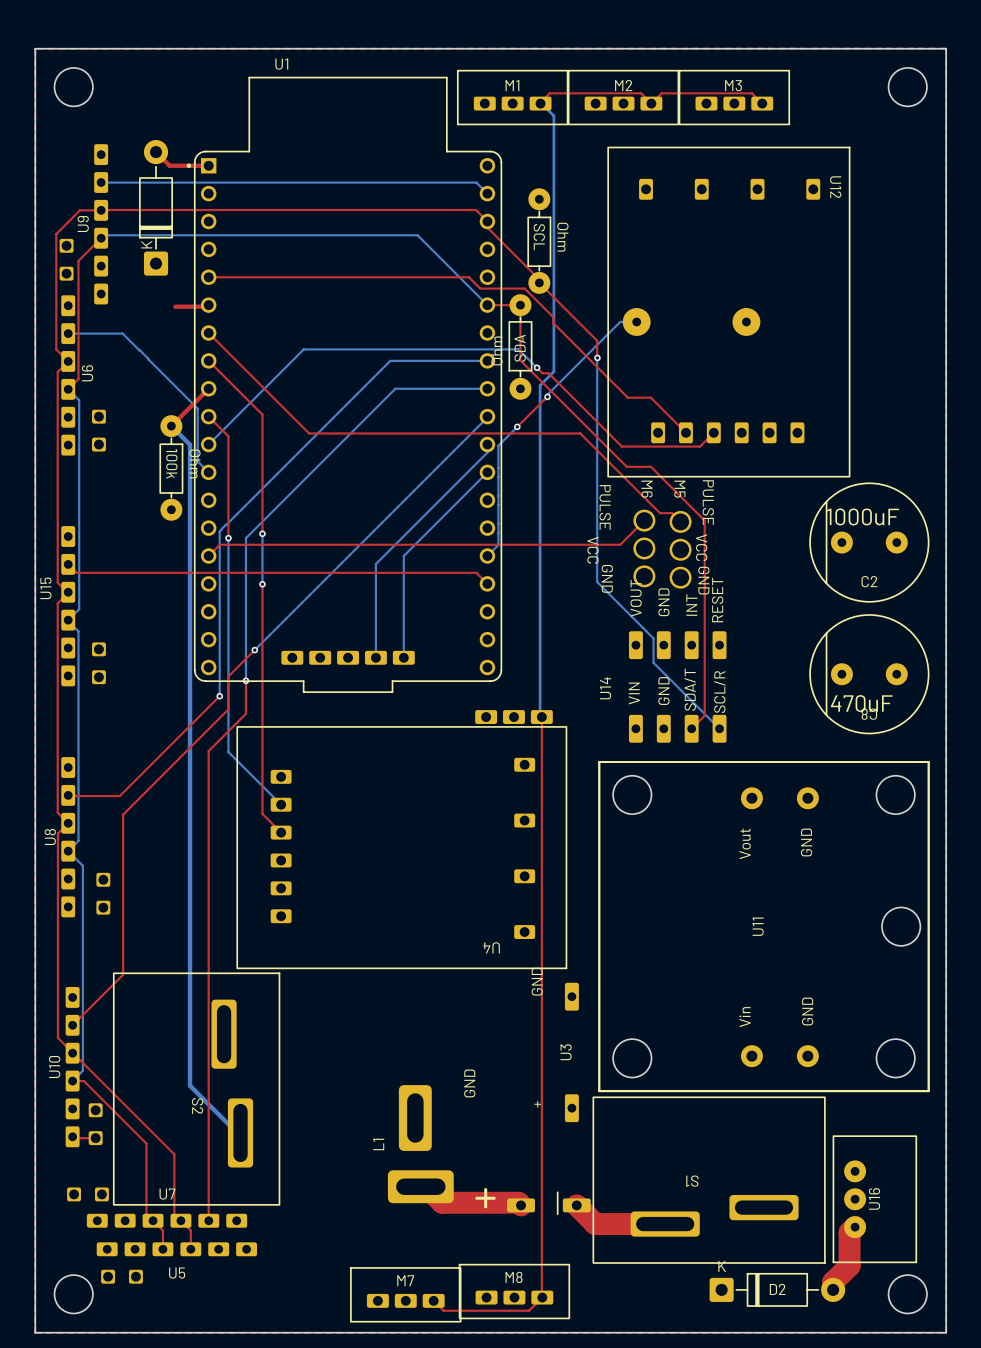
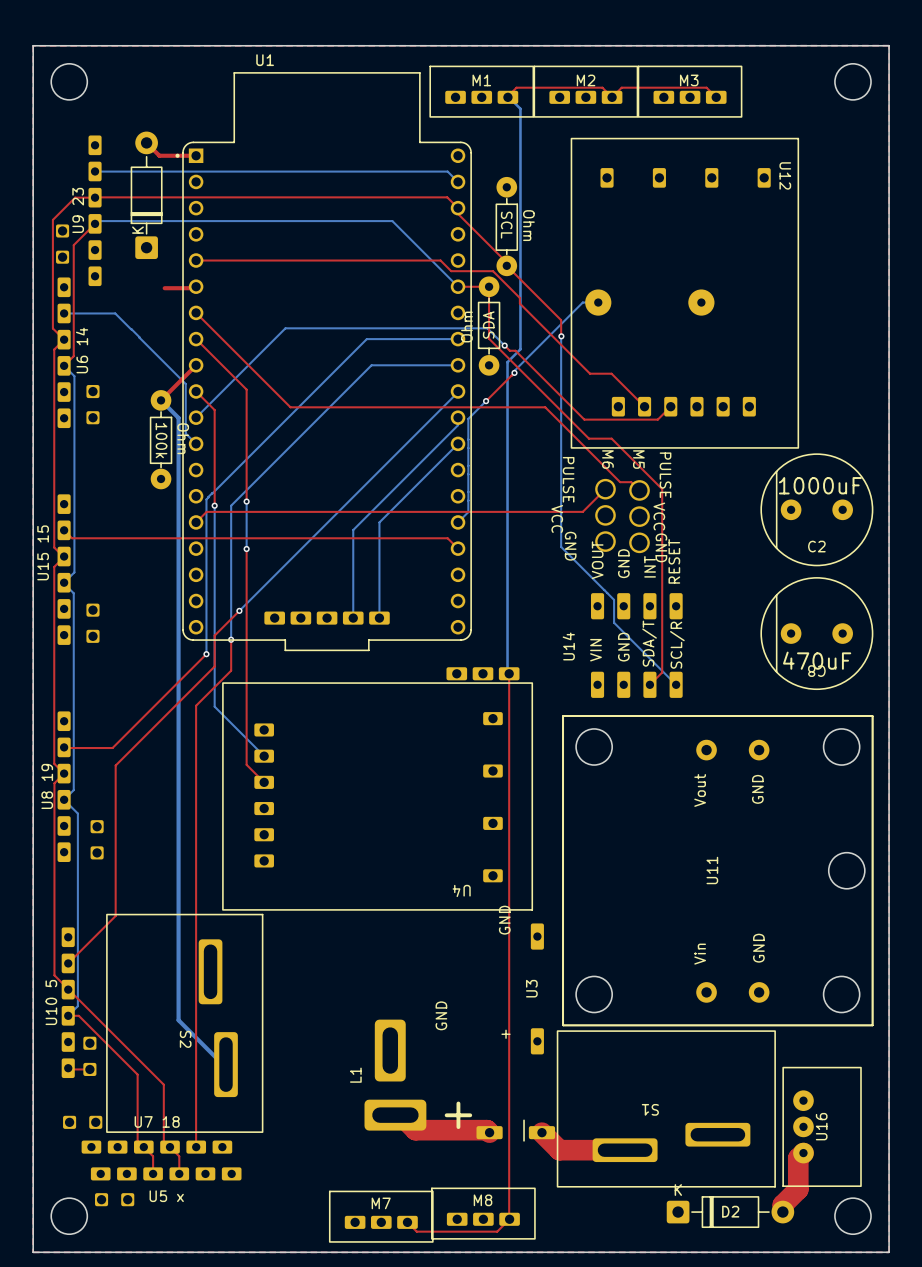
U9 name: U9 (83, 224) -> U9 23 (78, 210)
U6 name: U6 (87, 373) -> U6 14 (82, 350)
U15 name: U15 (45, 588) -> U15 15 (43, 552)
U8 name: U8 (50, 837) -> U8 19 (47, 786)
U10 name: U10 (54, 1067) -> U10 5 (51, 1002)
U7 name: U7 (167, 1194) -> U7 18 (157, 1121)
U5 name: U5 (177, 1273) -> U5 x (166, 1196)

